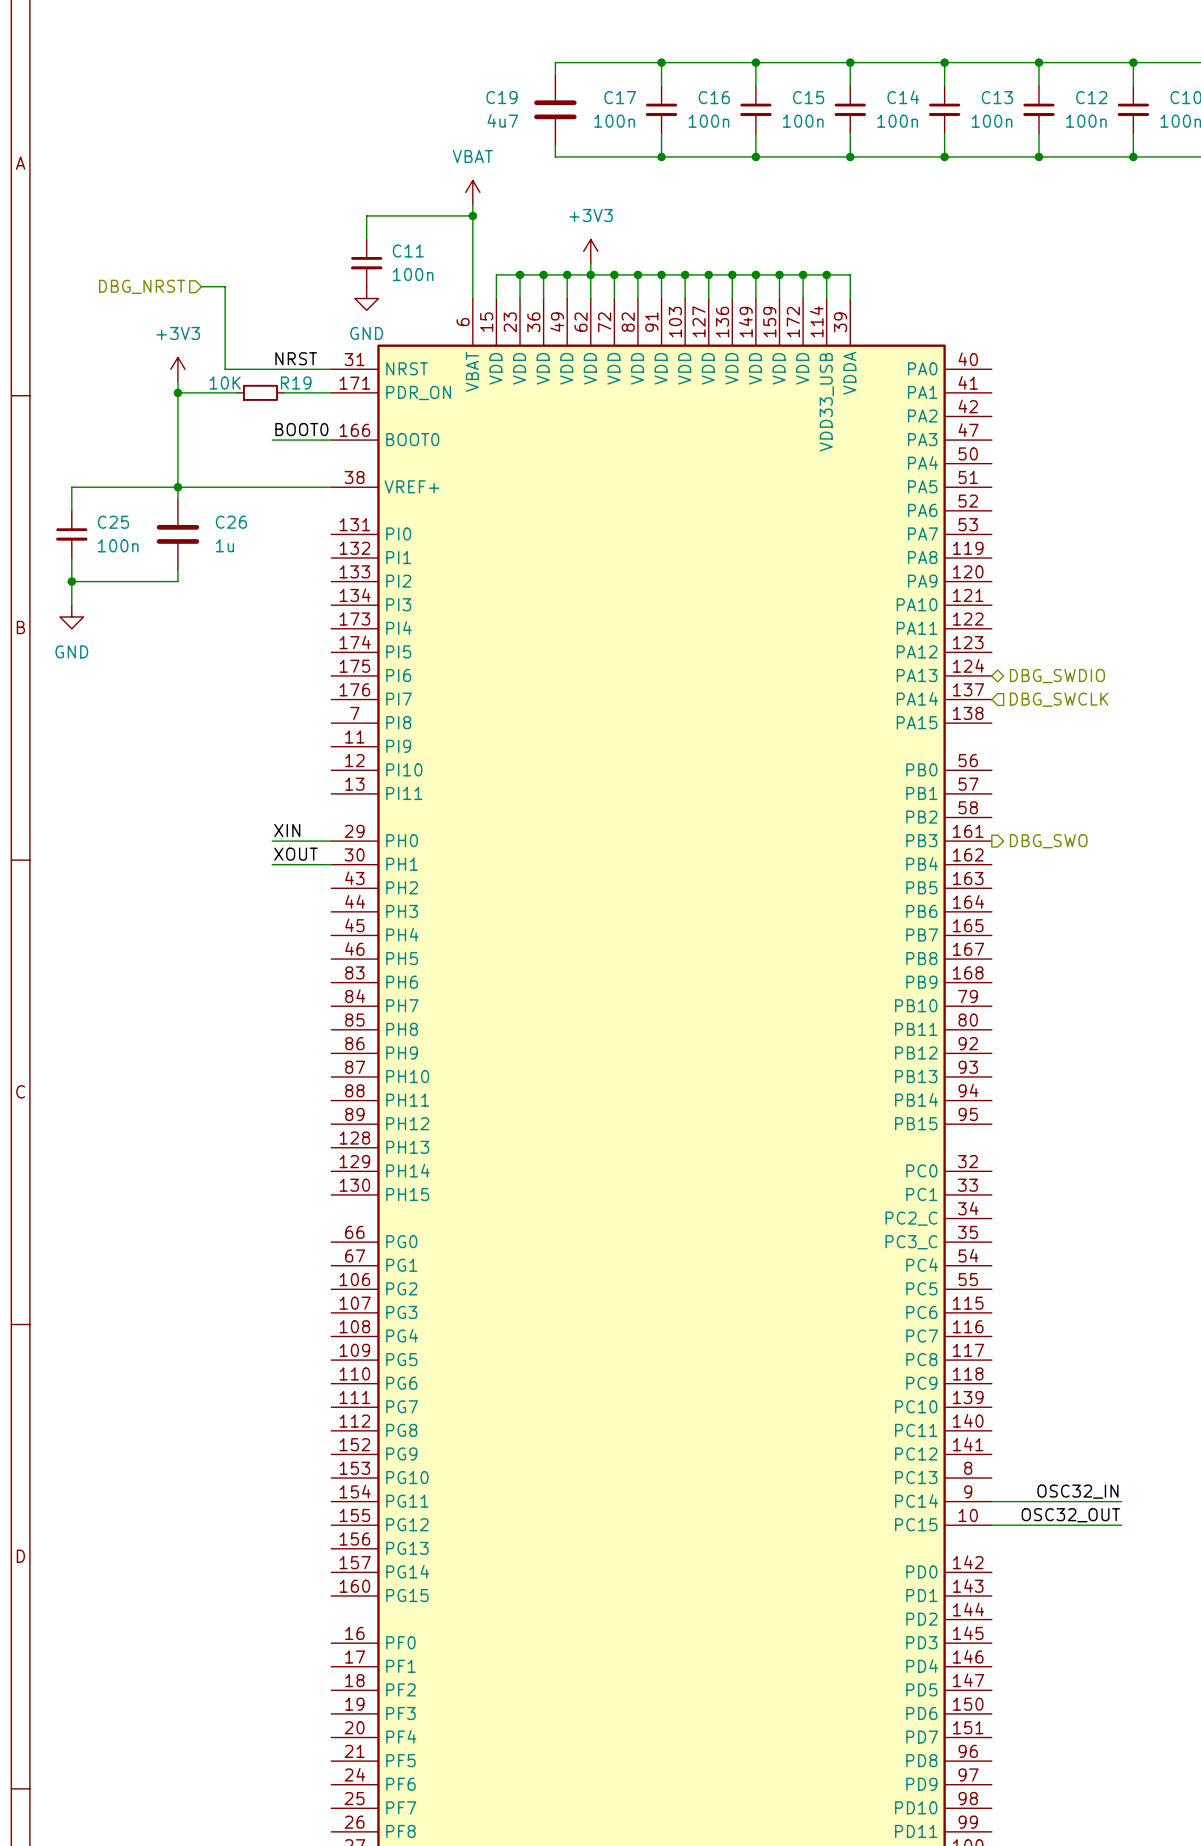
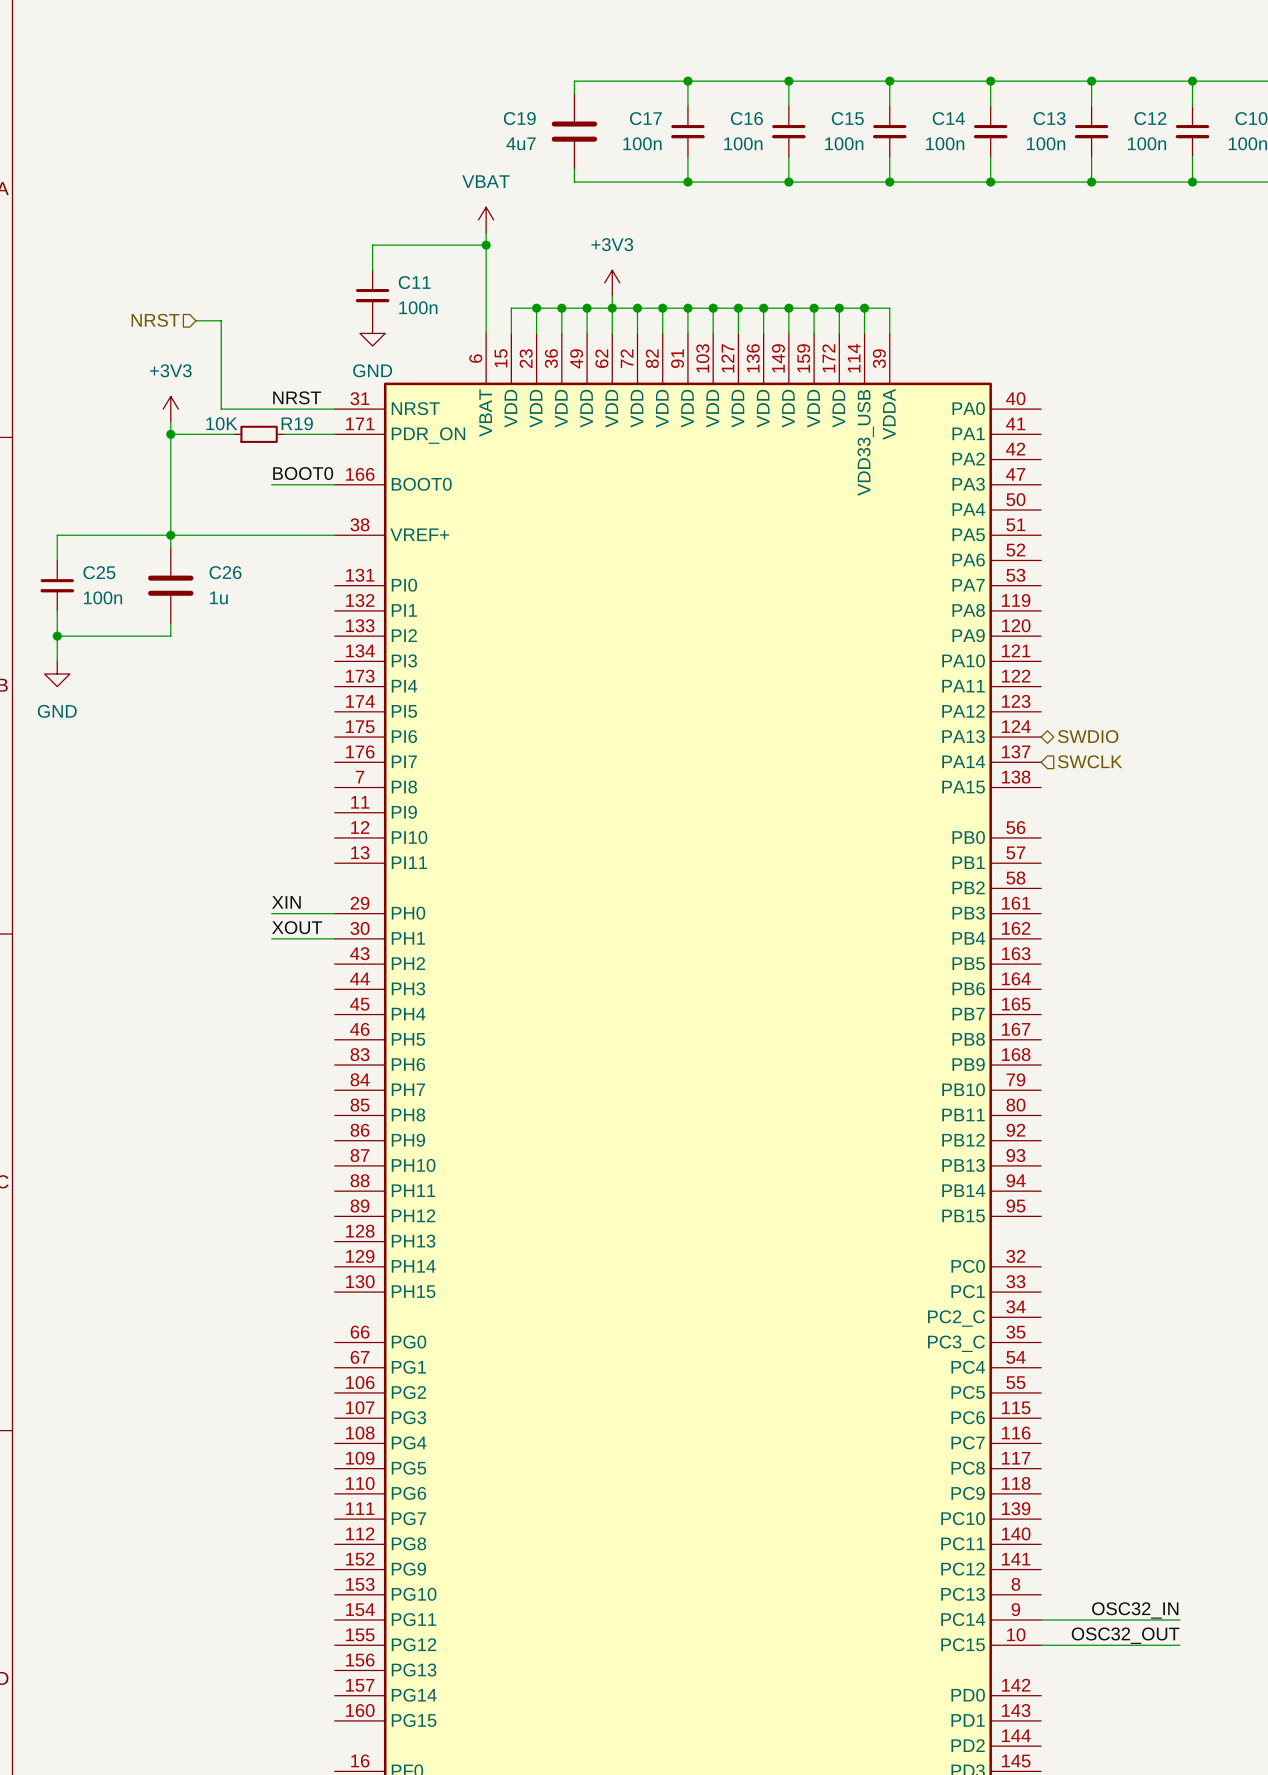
hierarchical label: DBG_NRST (142, 286) -> NRST (155, 320)
hierarchical label: DBG_SWDIO (1057, 676) -> SWDIO (1088, 736)
hierarchical label: DBG_SWCLK (1059, 699) -> SWCLK (1090, 761)
hierarchical label: DBG_SWO (1048, 841) -> none

